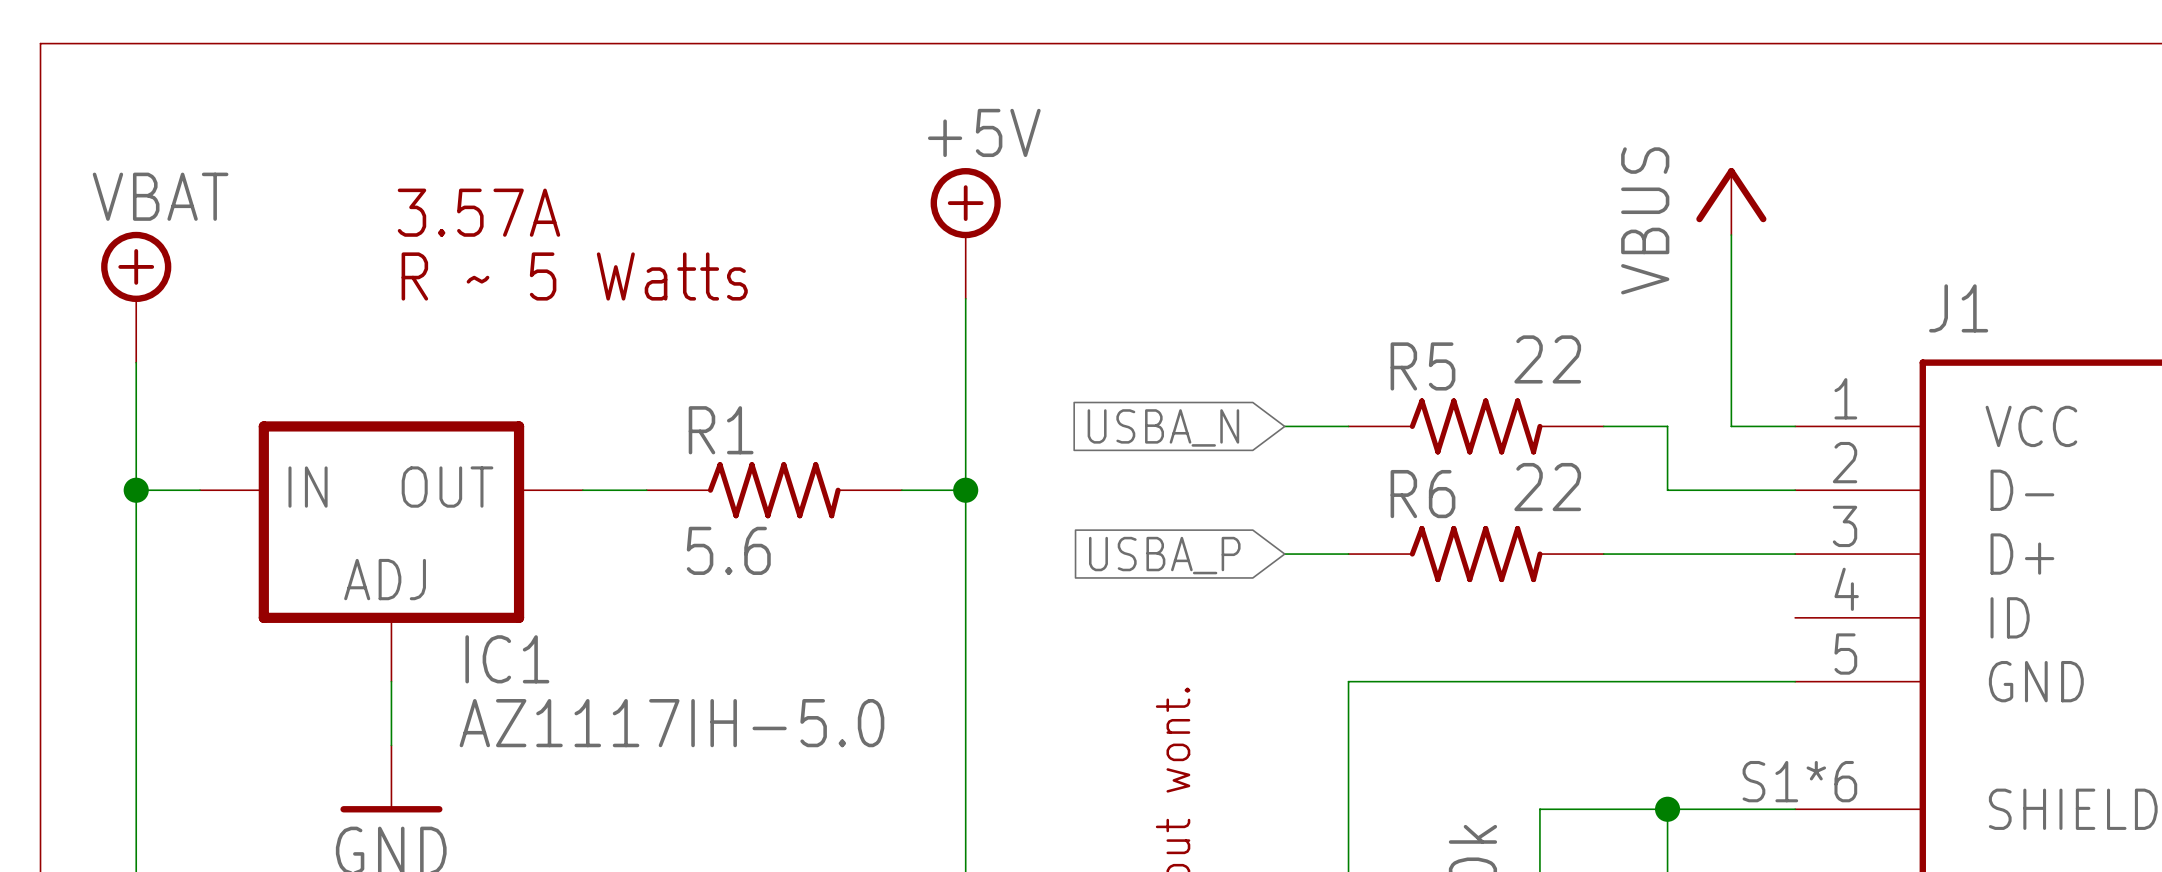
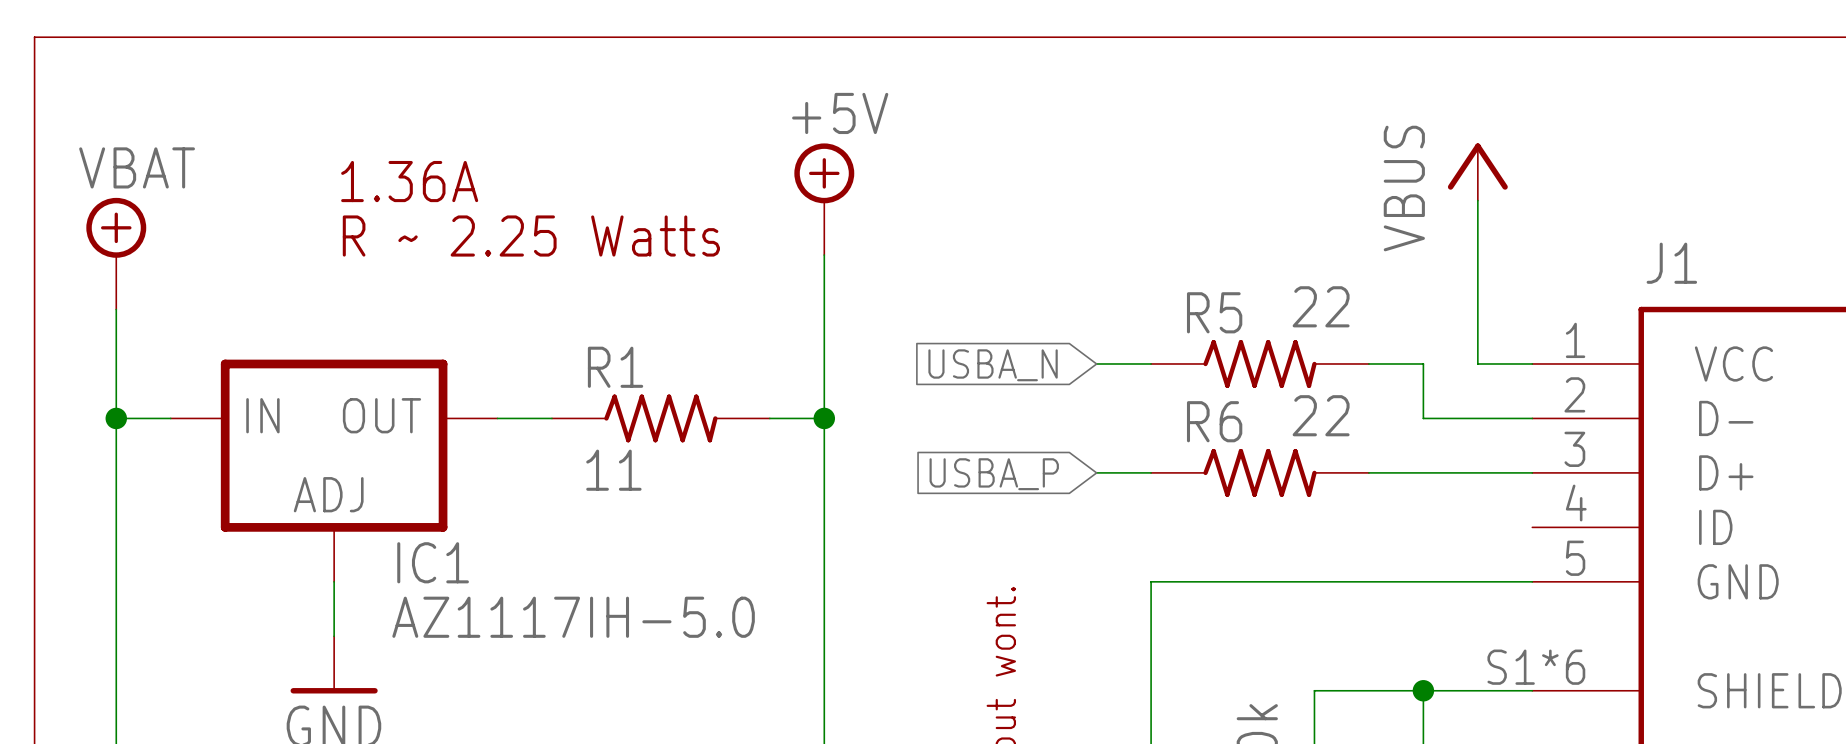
text: 3.57A (478, 212) -> 1.36A (409, 181)
text: R ~ 5 Watts (574, 276) -> R ~ 2.25 Watts (531, 236)
R1 value: 5.6 (728, 550) -> 11 (613, 470)

